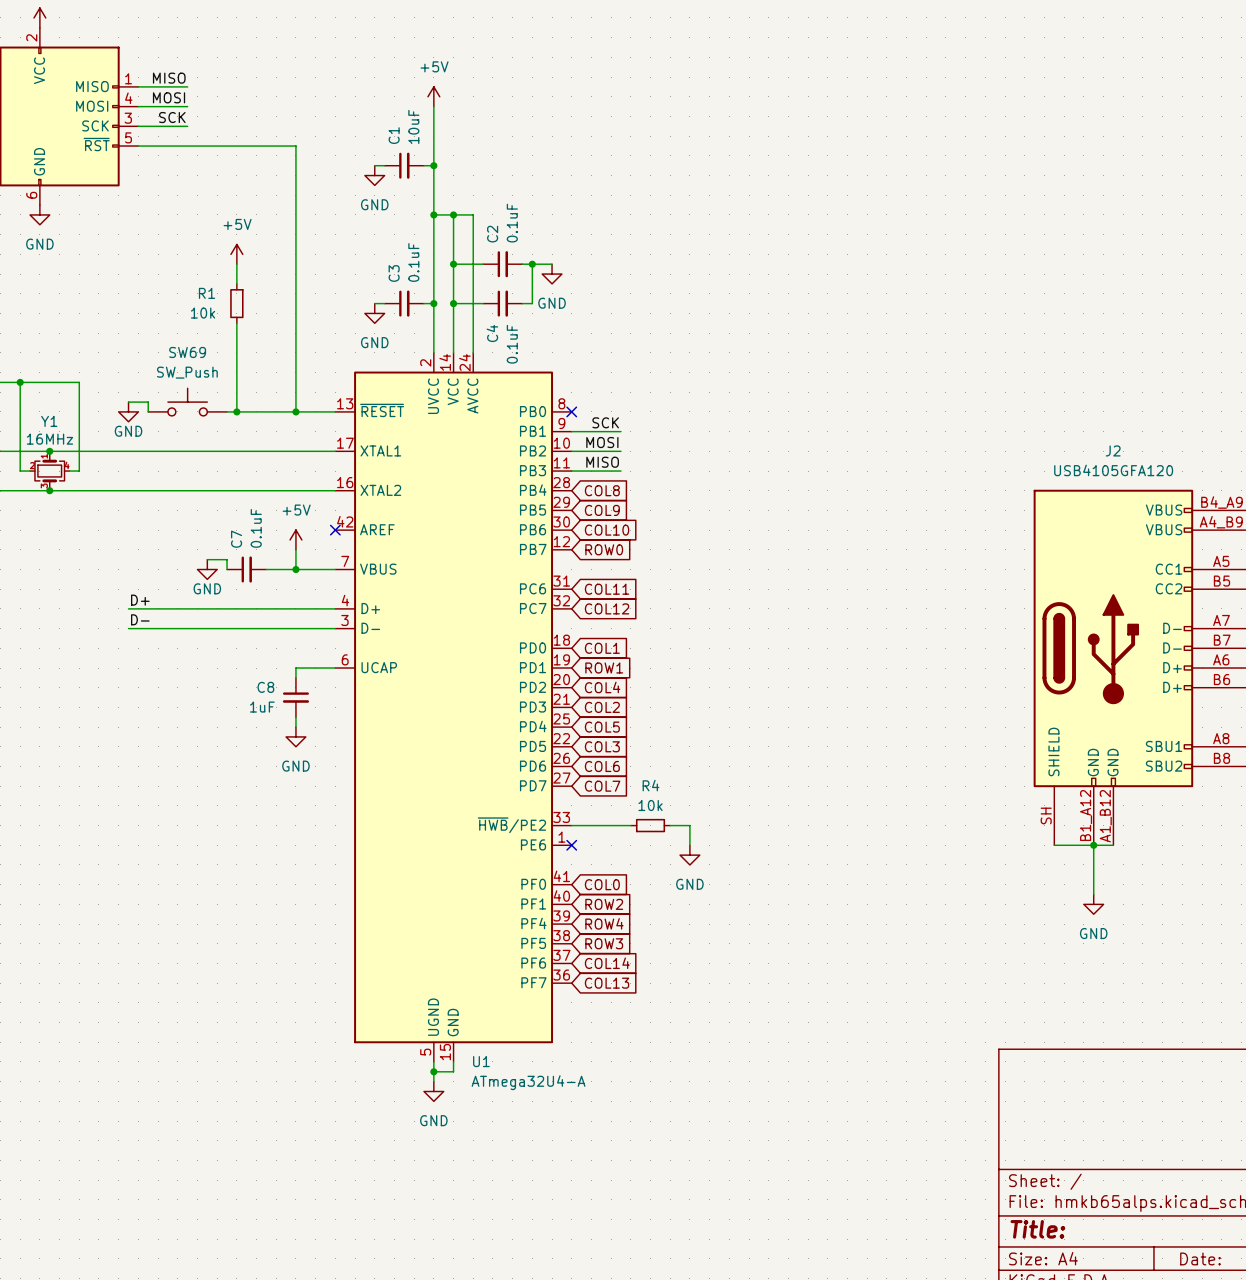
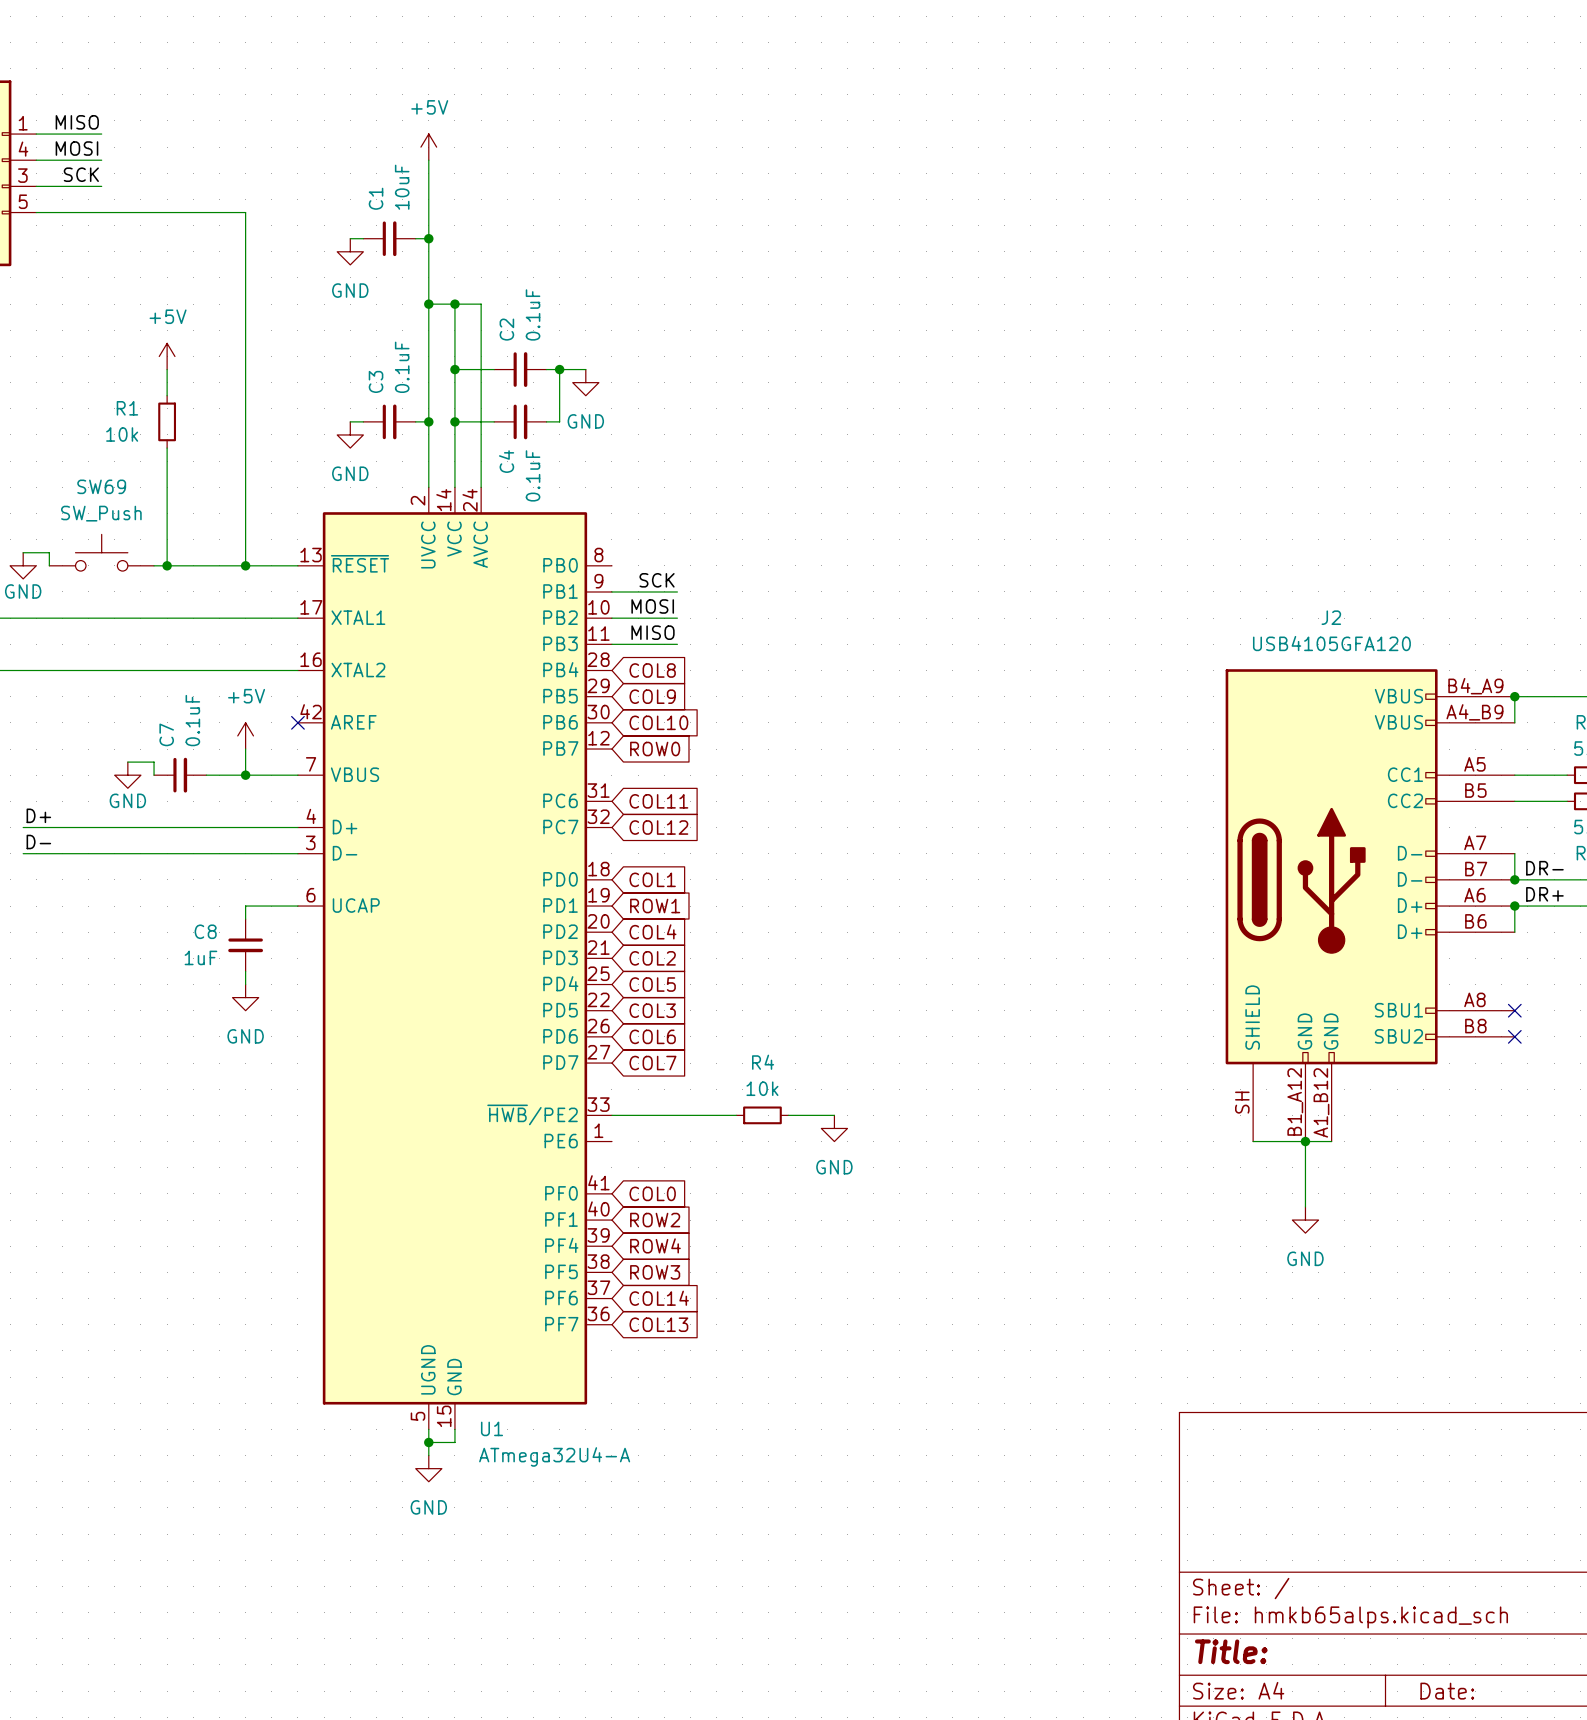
no-connect mark: (571, 411) -> none
wire: none -> (690, 1115) (736, 1115)
R4 position: (650, 825) -> (762, 1115)
wire: (670, 825) (689, 825) (689, 845) -> none
wire: none -> (788, 1115) (834, 1115)
no-connect mark: (571, 845) -> none
power symbol position: GND (689, 855) -> GND (834, 1128)

